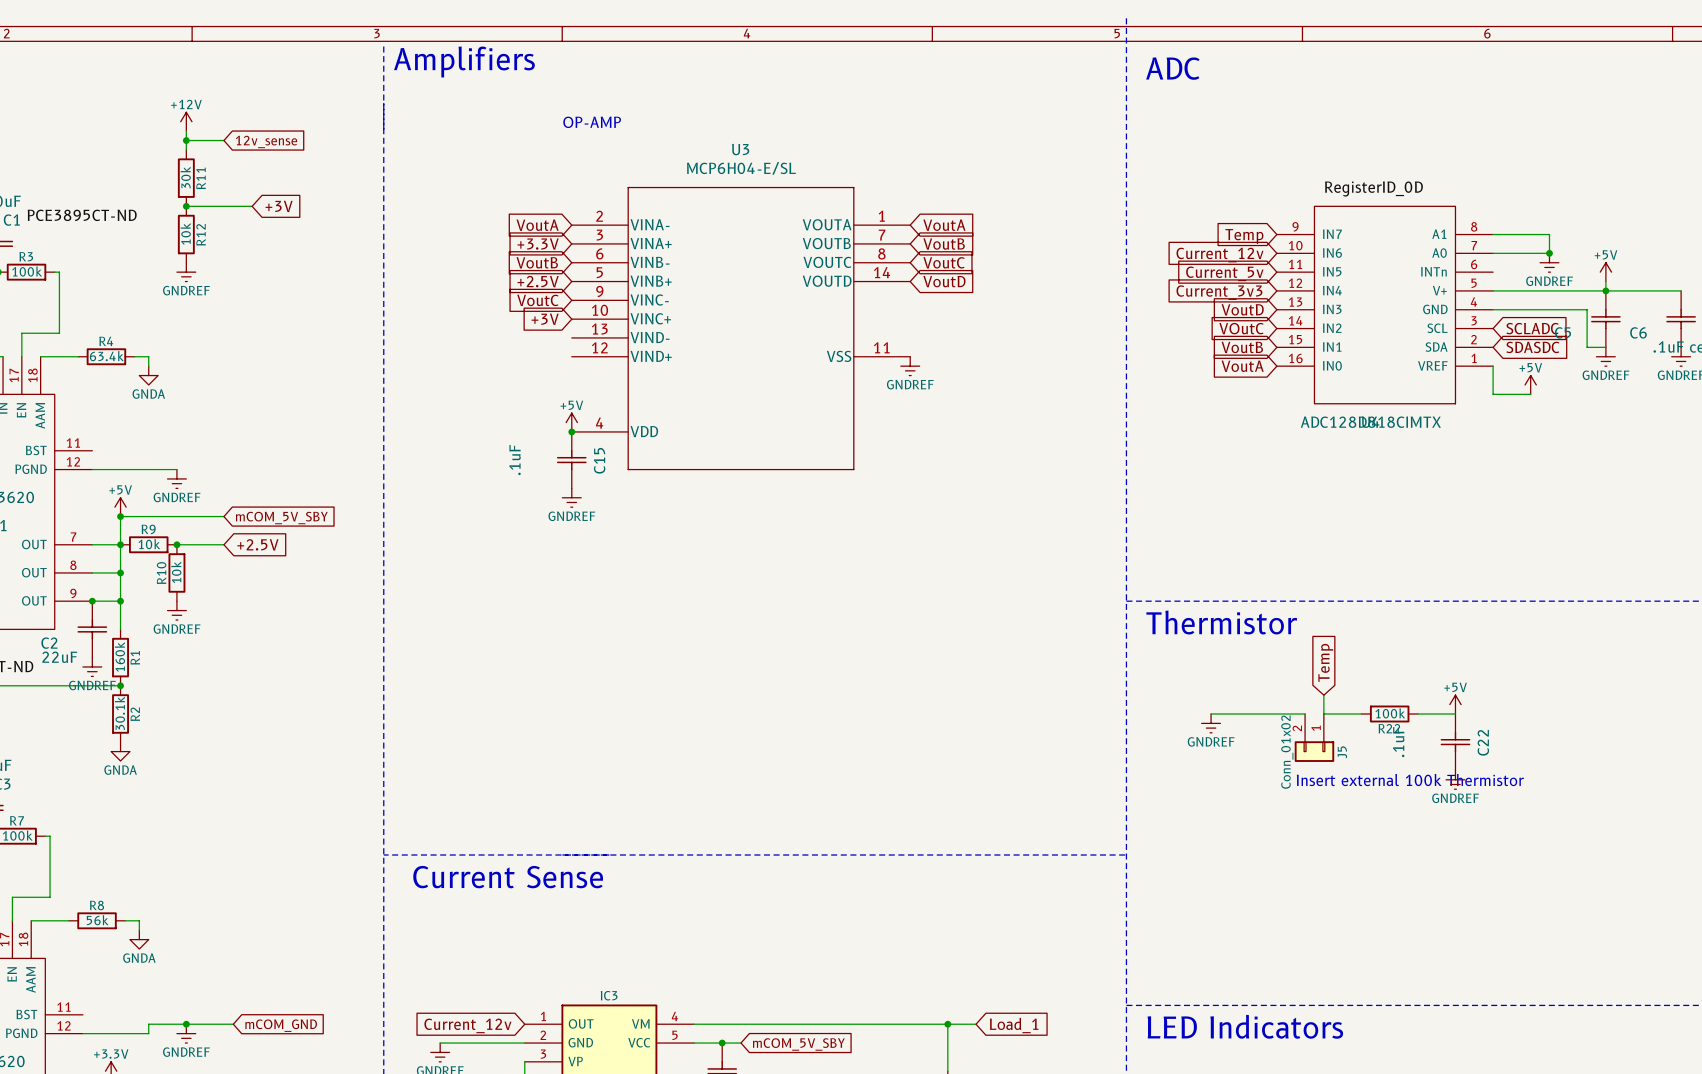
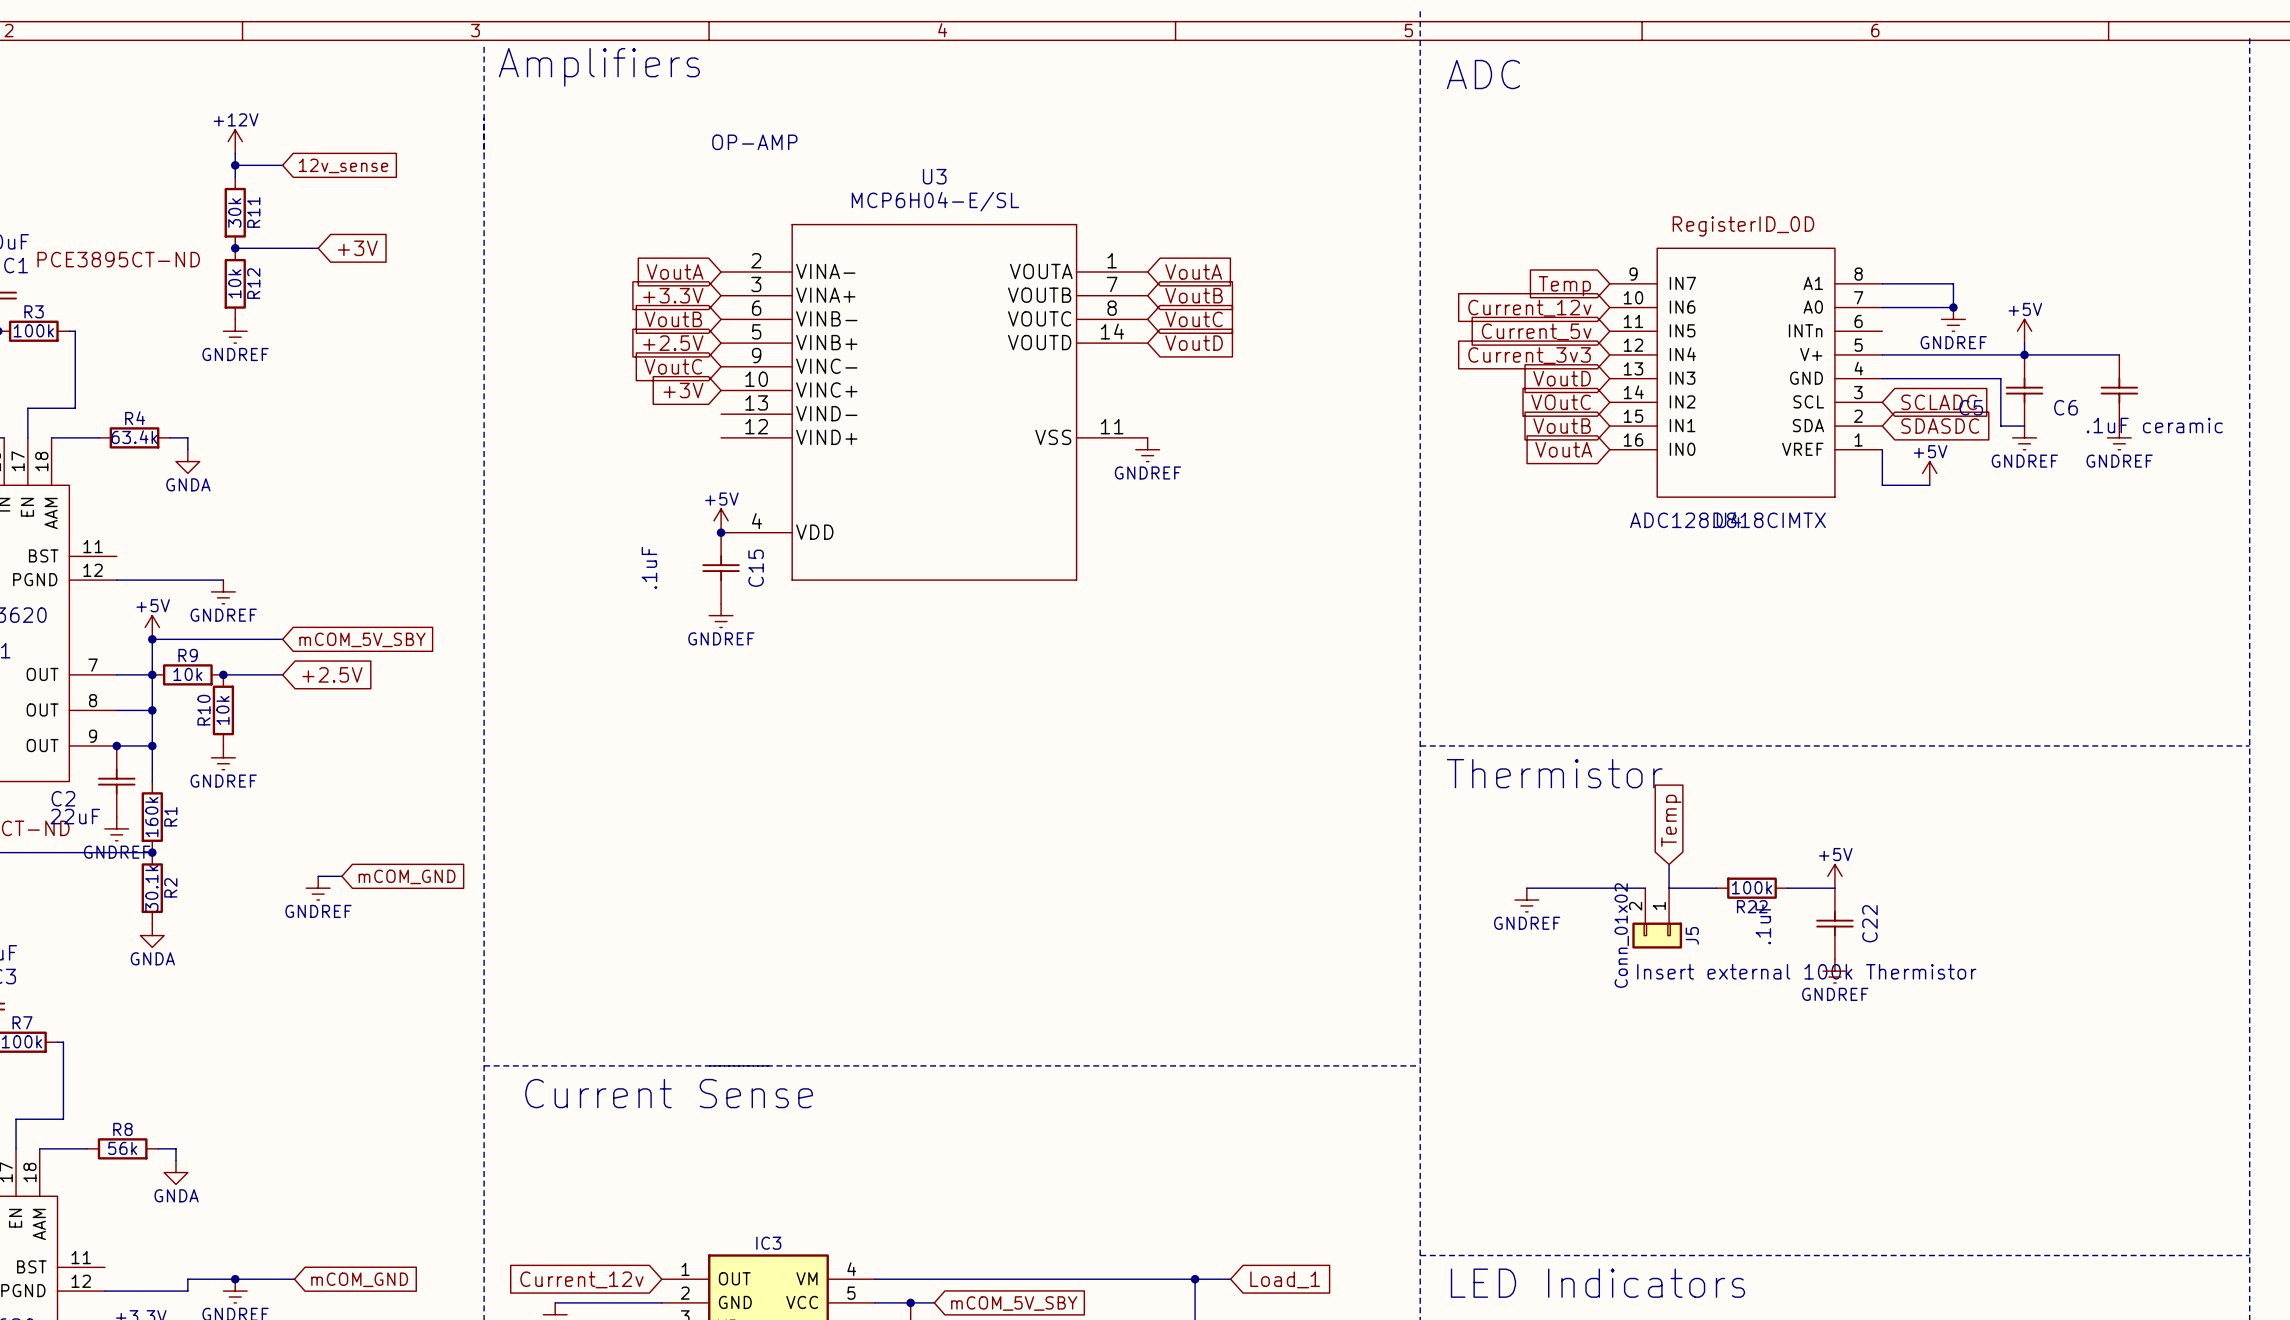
wire: none -> (318, 876) (341, 876)
global label: none -> mCOM_GND (407, 876)
power symbol: none -> GNDREF (318, 888)

